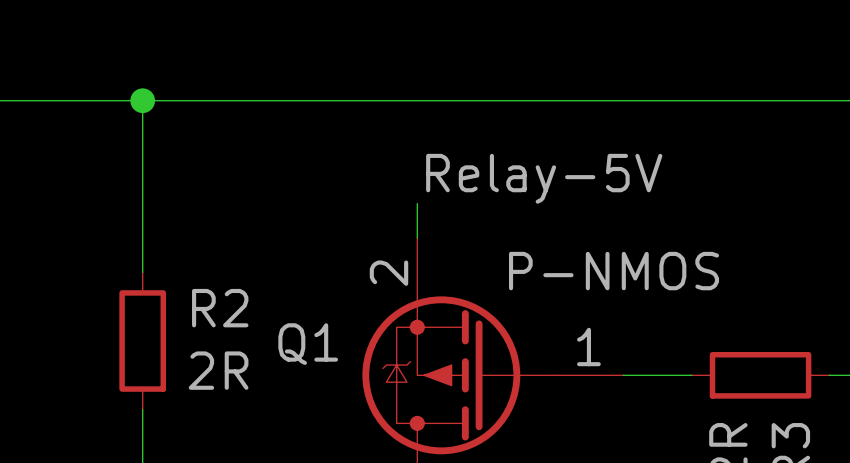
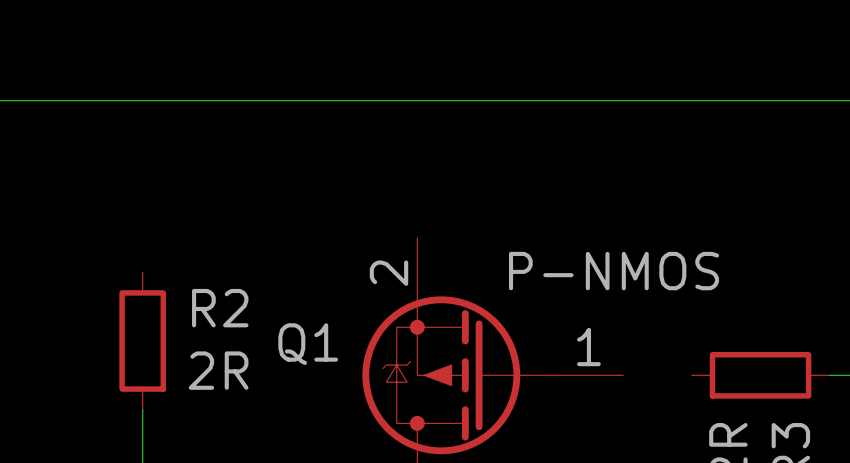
wire: (142, 100) (142, 272) -> none
junction: (142, 100) -> none
label: Relay-5V (544, 178) -> none
wire: (417, 203) (417, 238) -> none
wire: (623, 375) (691, 375) -> none

